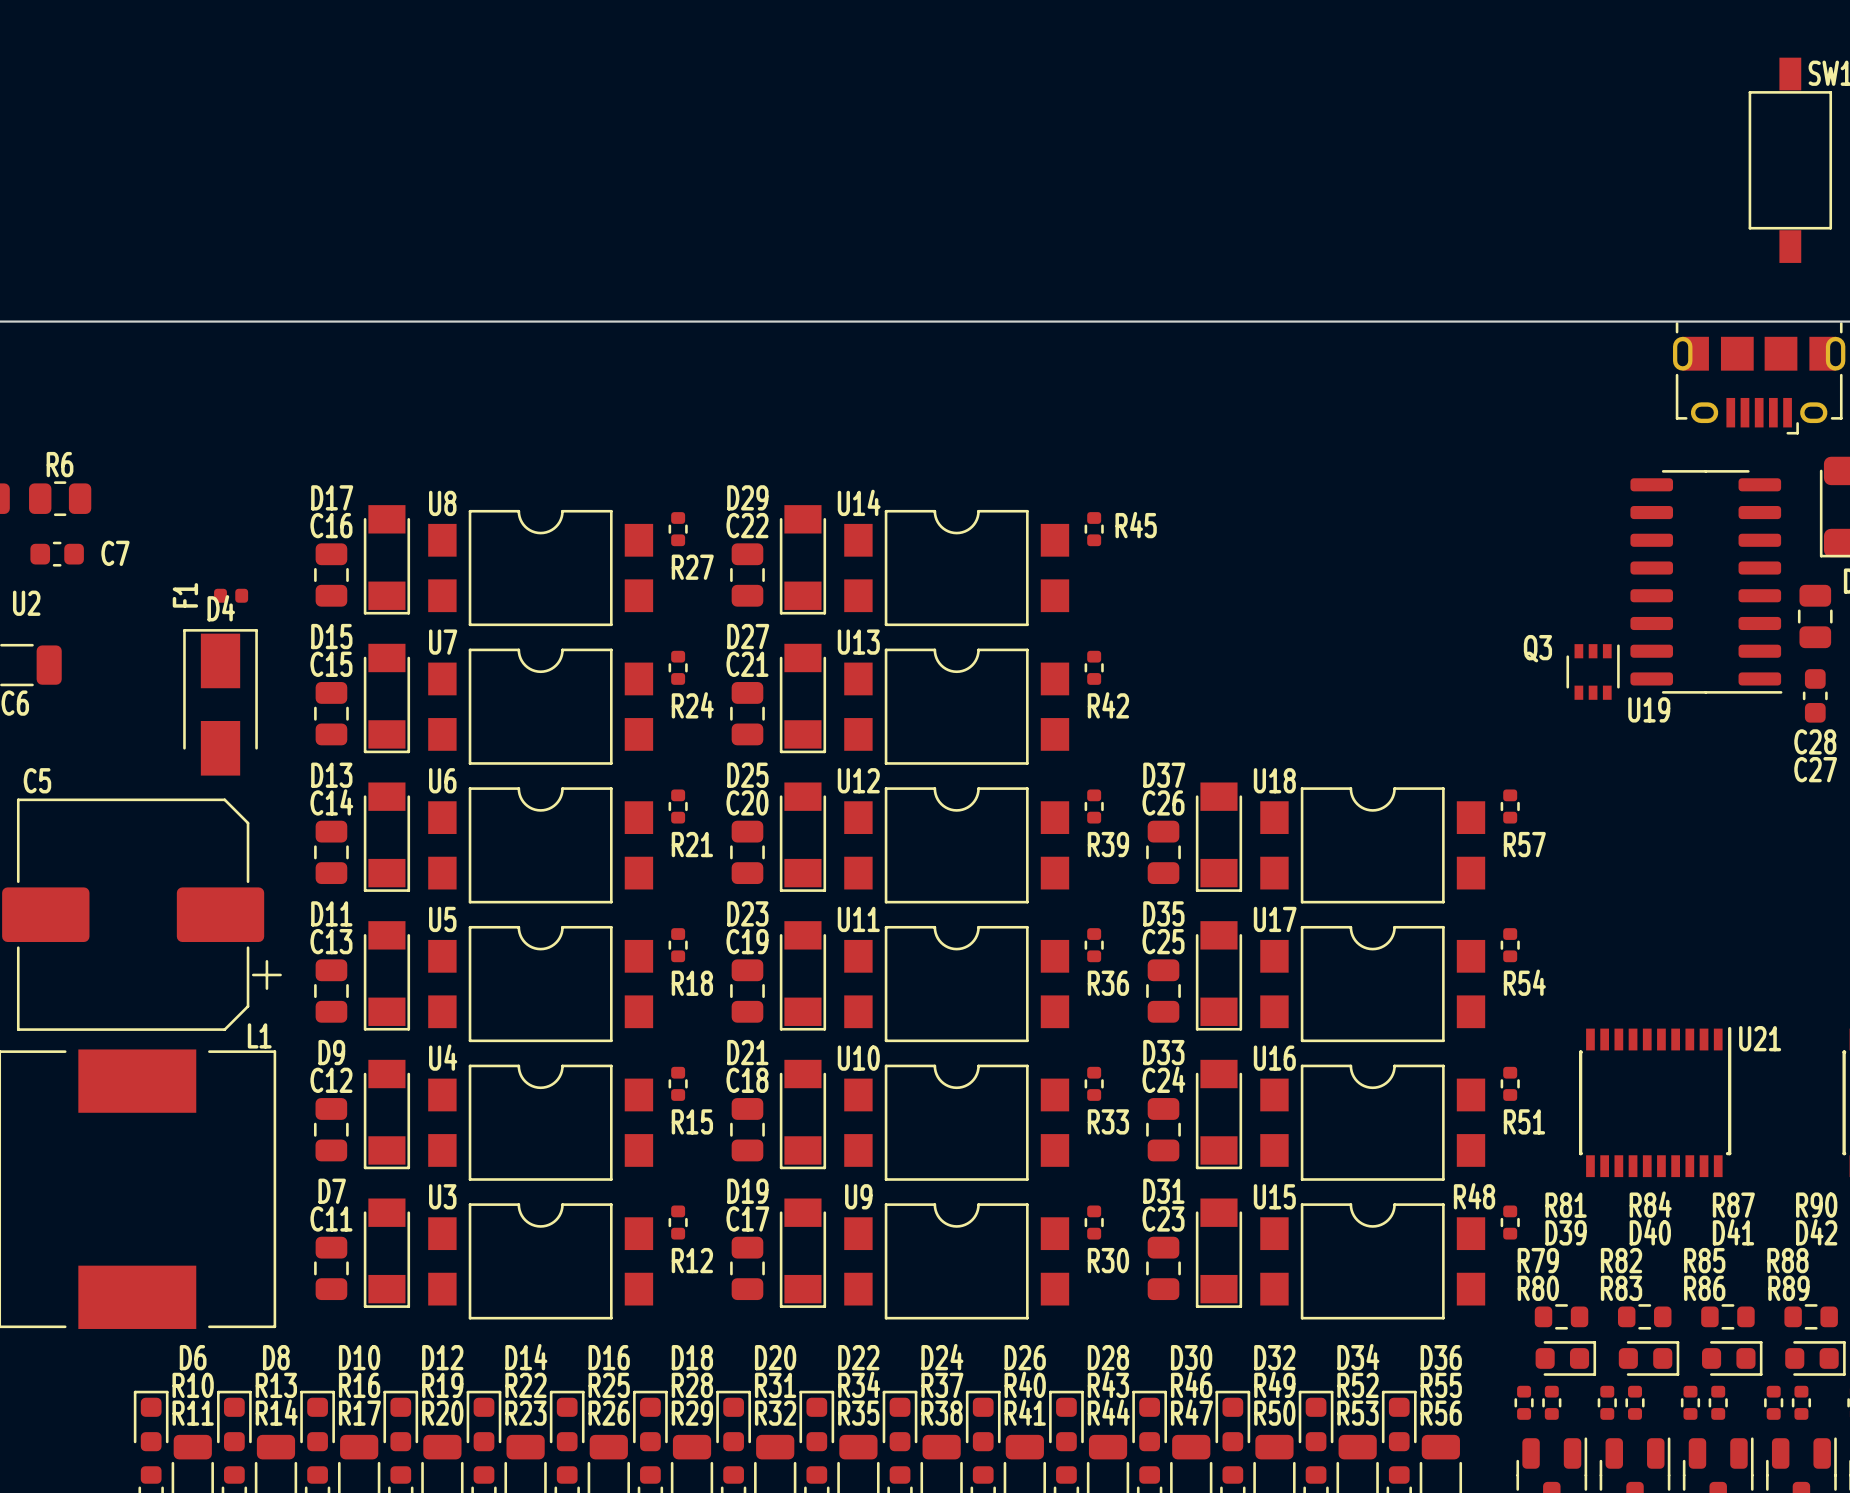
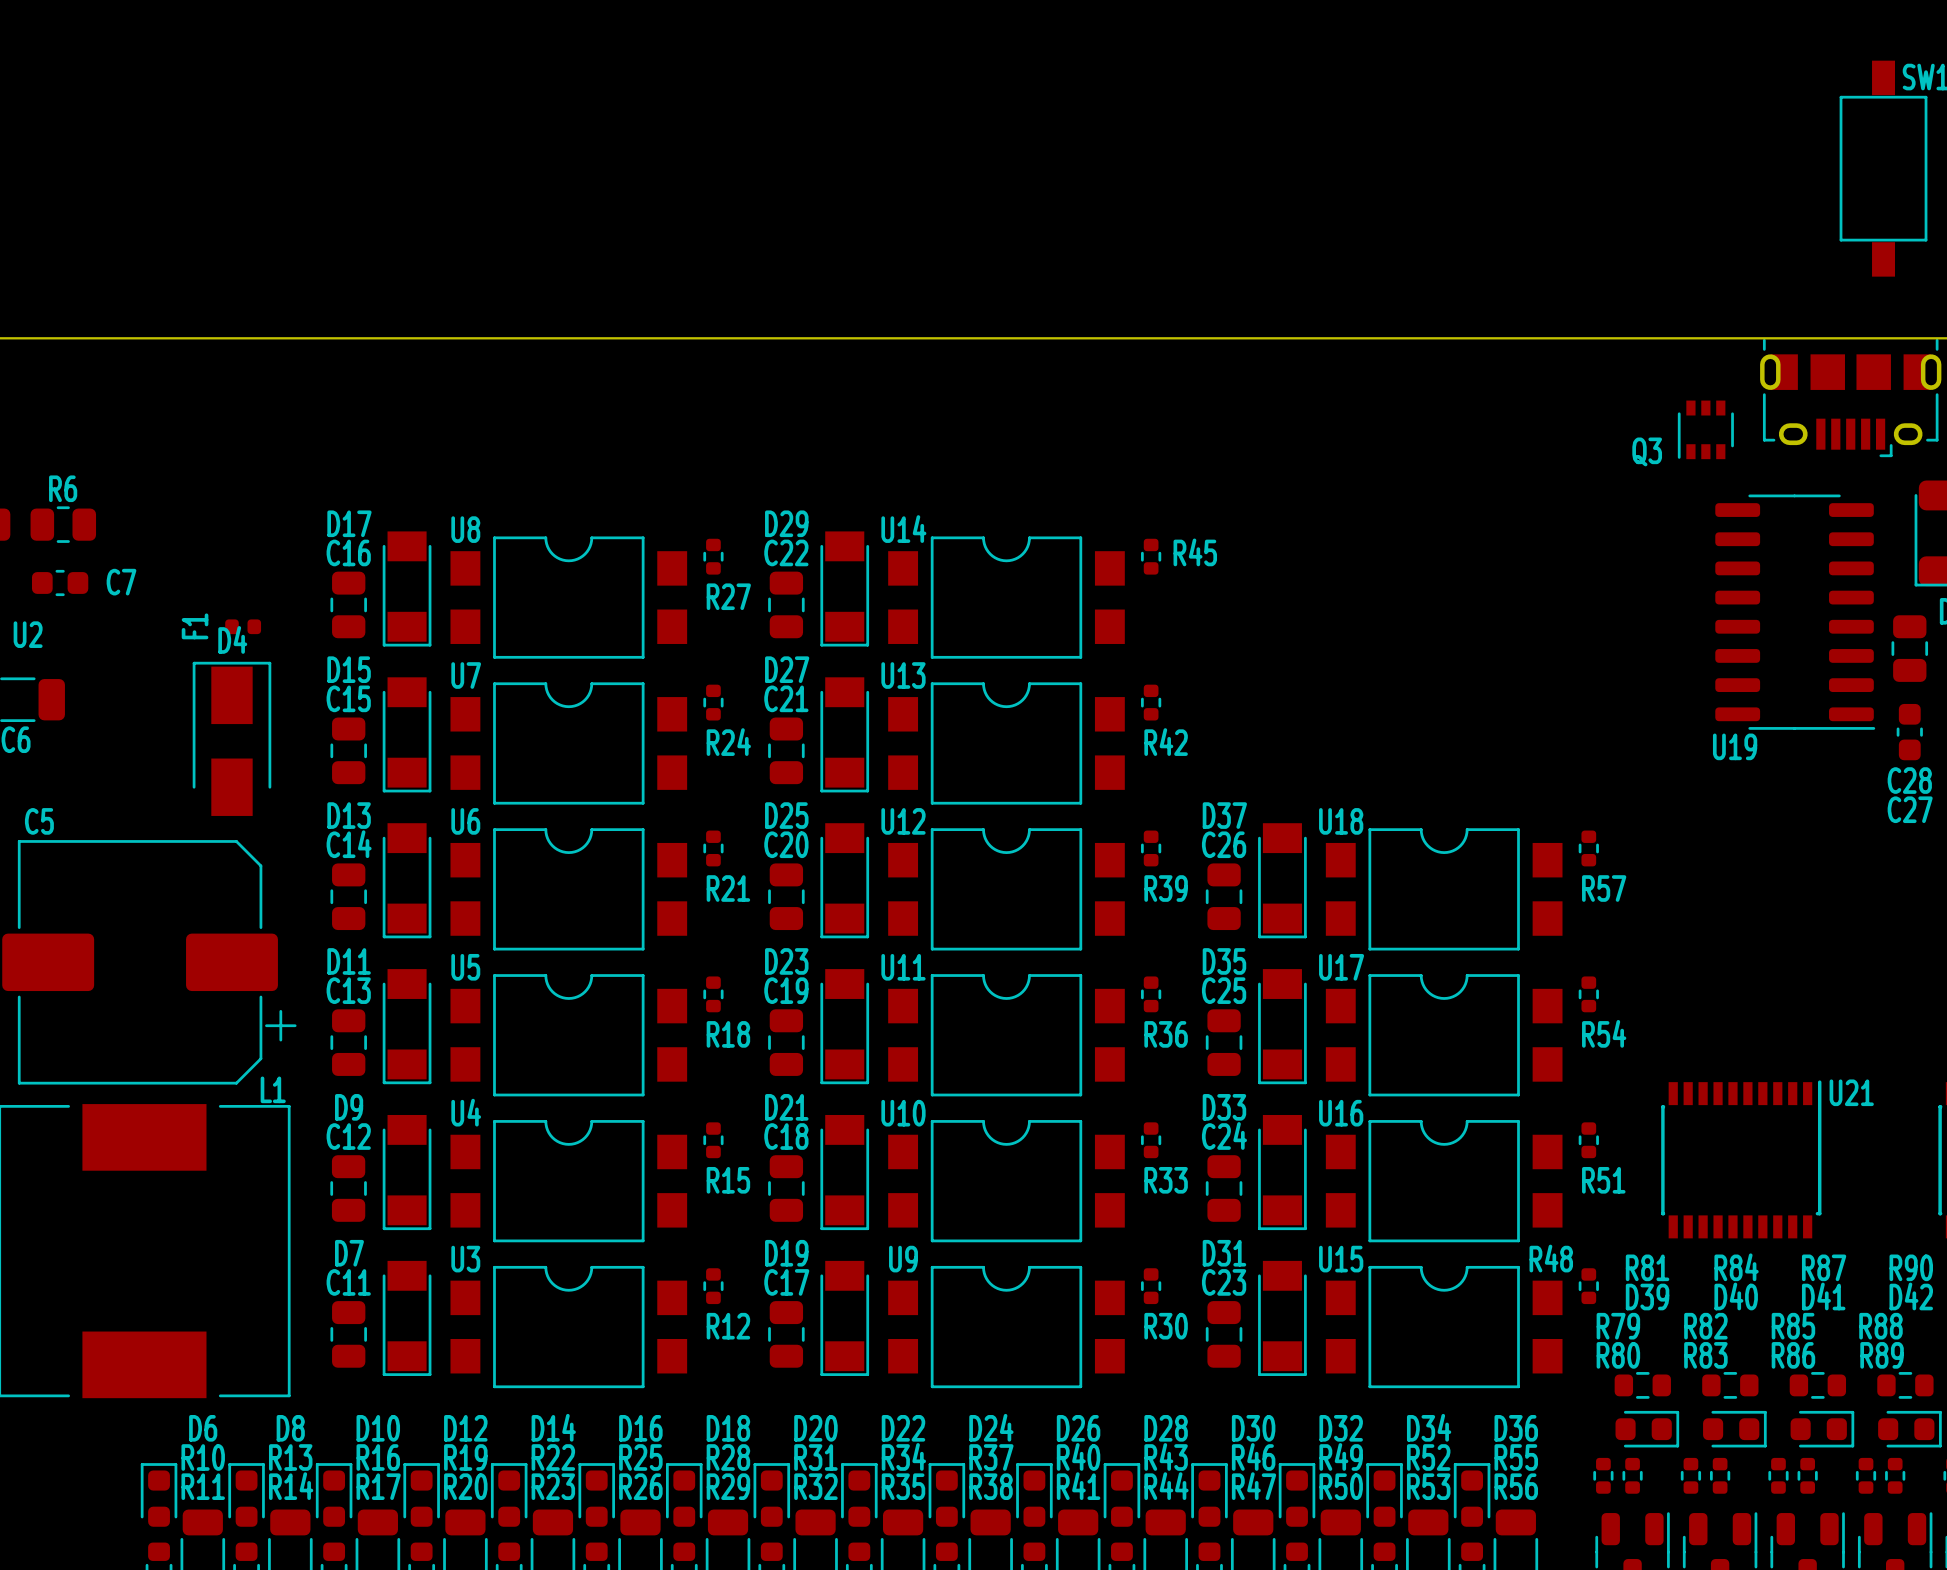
Q3 name position: Q3 (1537, 648) -> Q3 (1647, 451)
Q3 rotation: 0° (1593, 671) -> 180° (1705, 429)
Q3 position: (1593, 671) -> (1705, 429)

